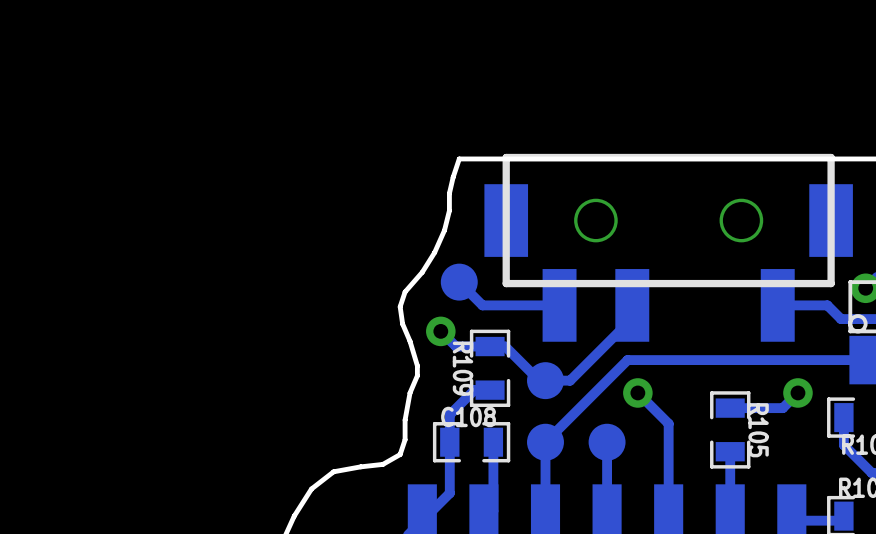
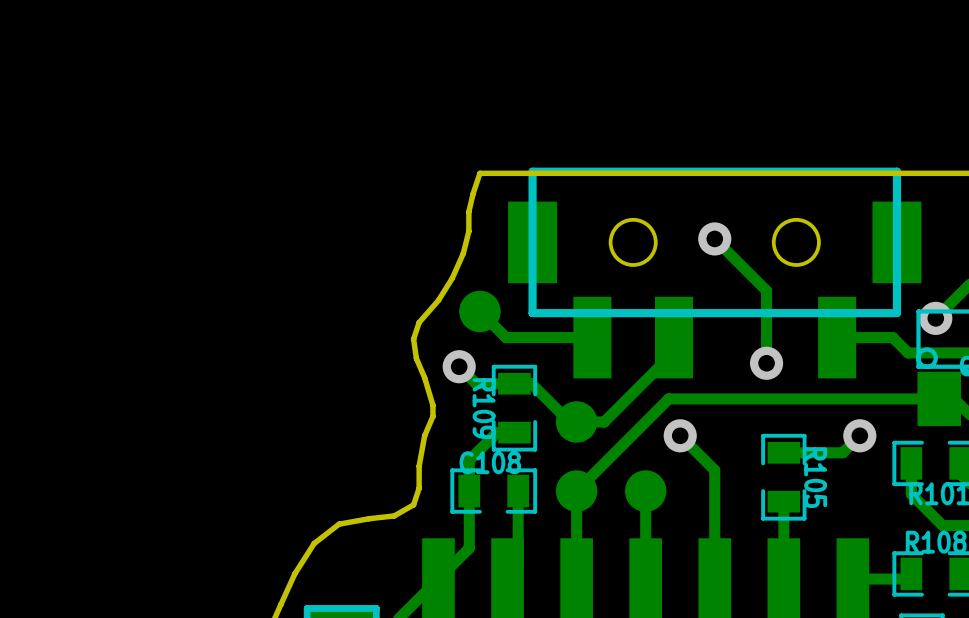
track: none -> (714, 238) (766, 290) (766, 363)
via: none -> (714, 238)
via: none -> (766, 363)

